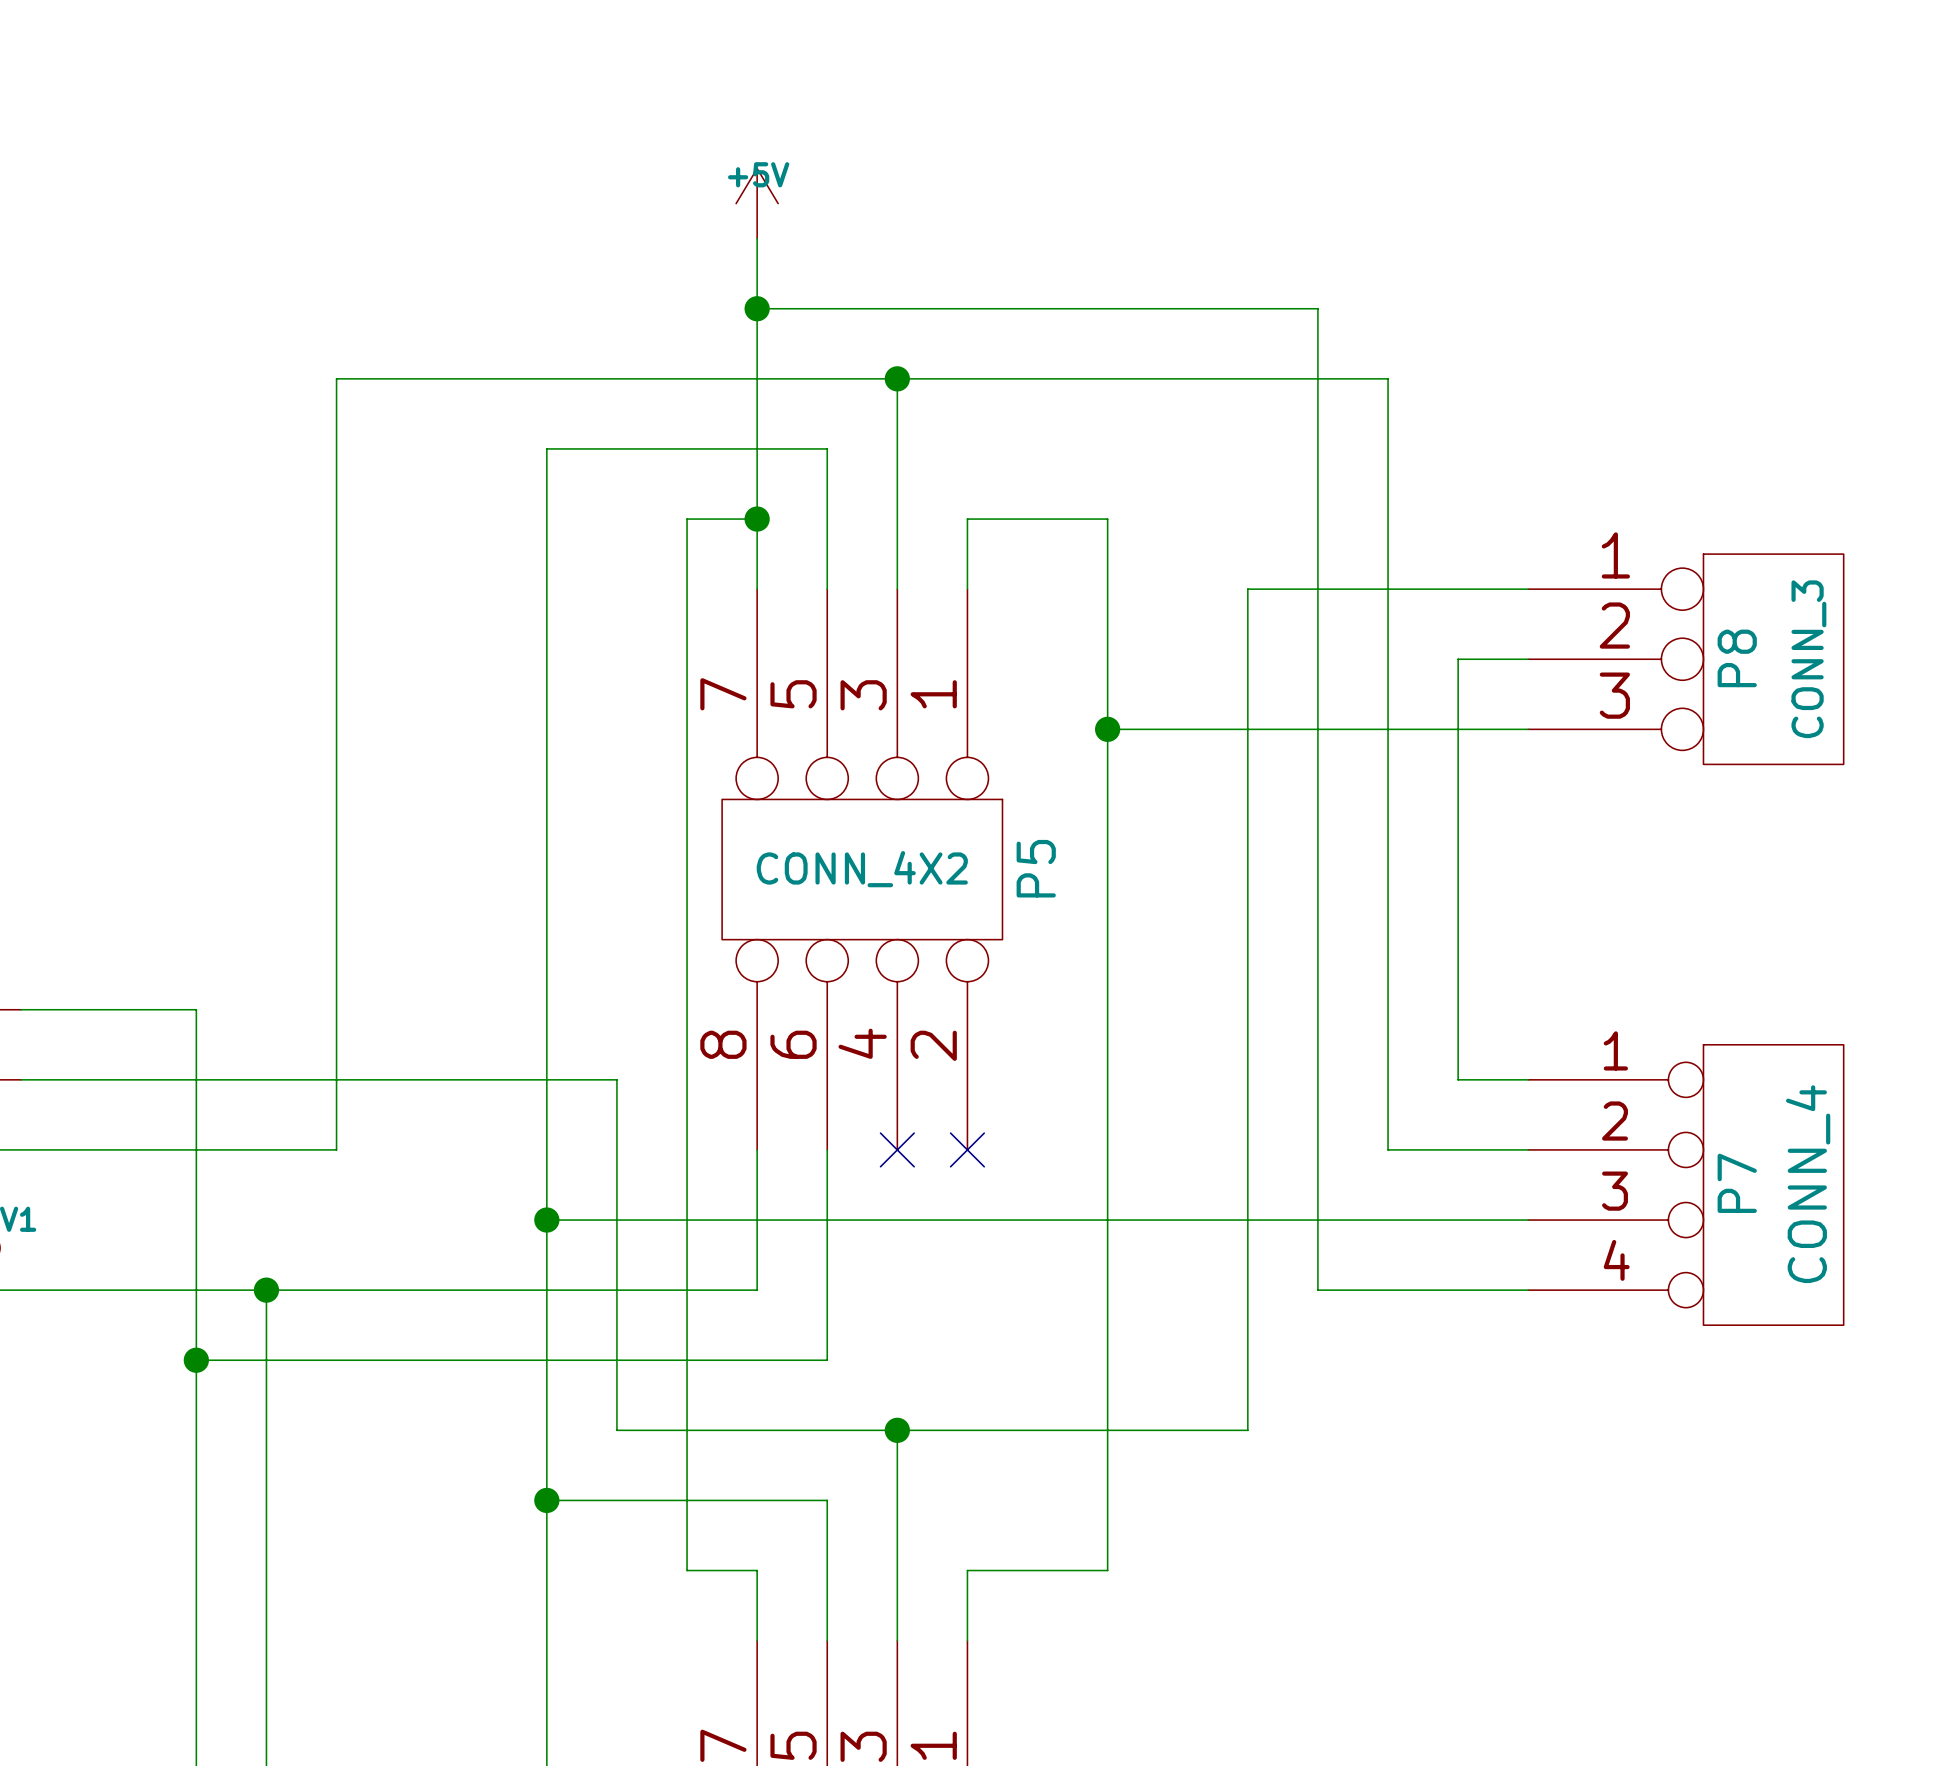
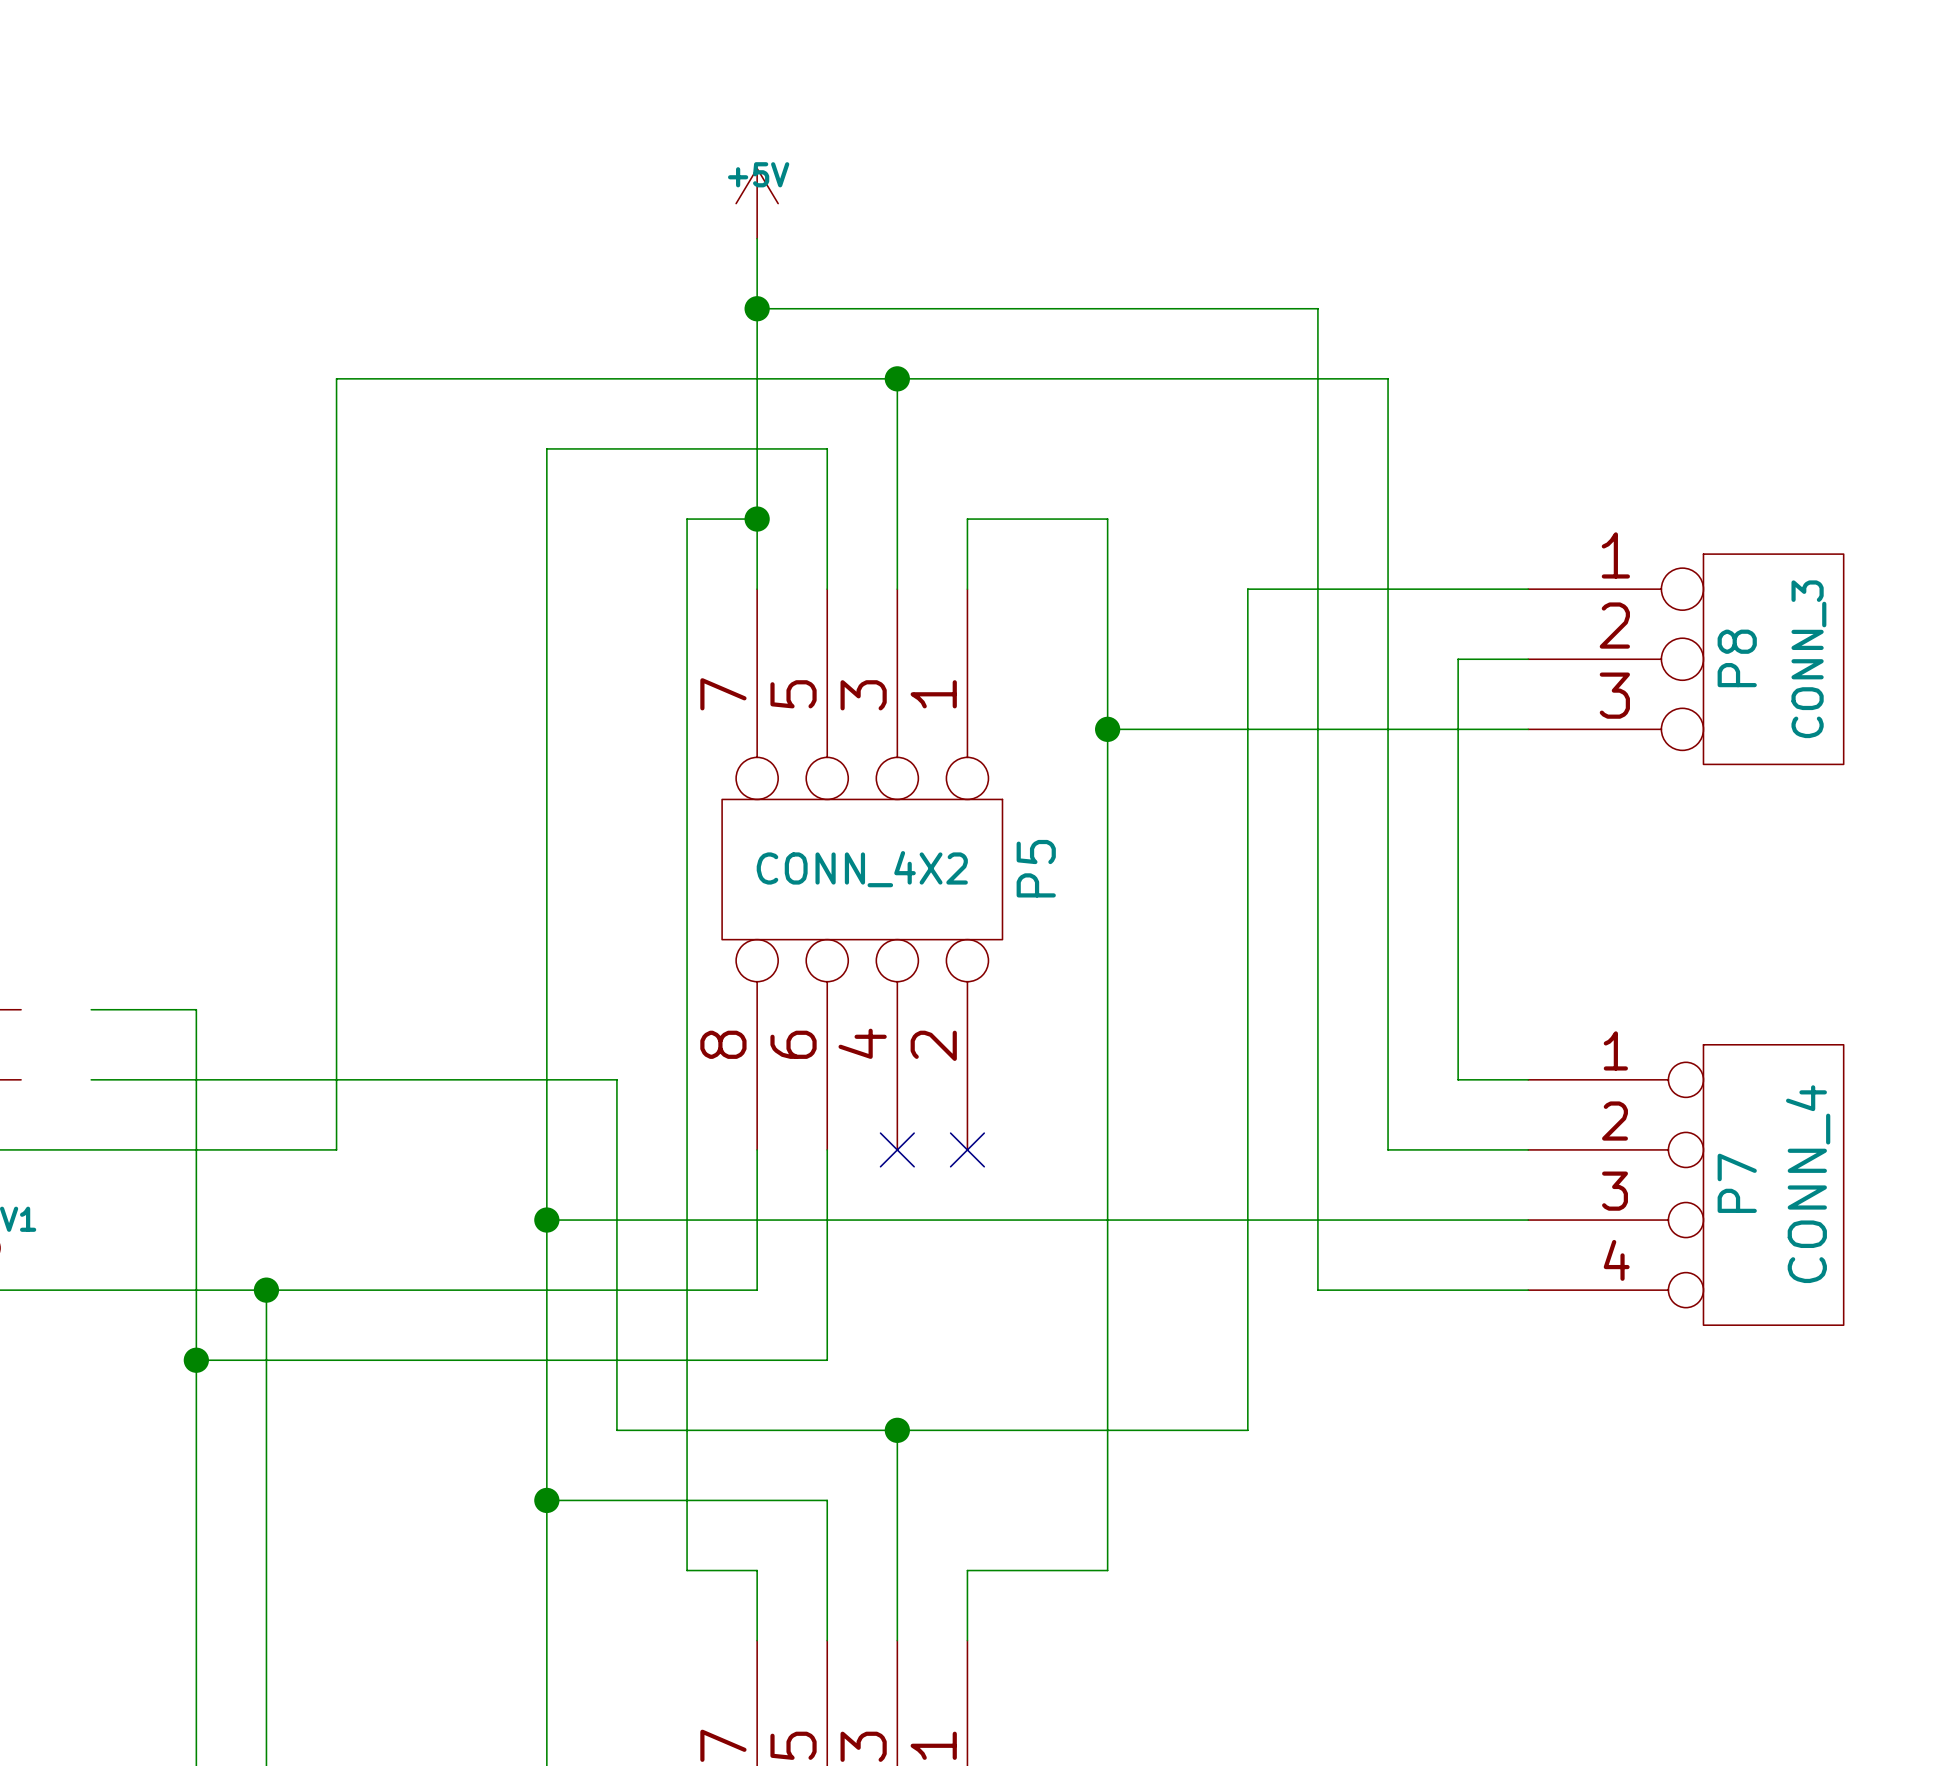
wire: (21, 1009) (91, 1009) -> none
wire: (21, 1079) (91, 1079) -> none

